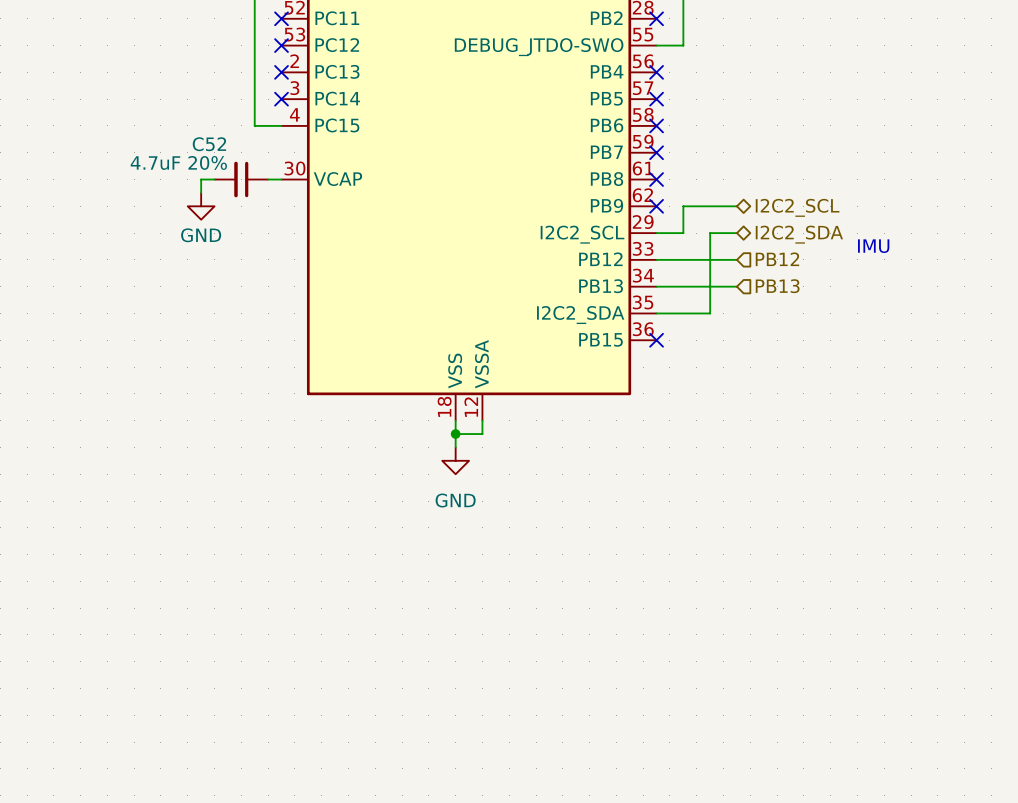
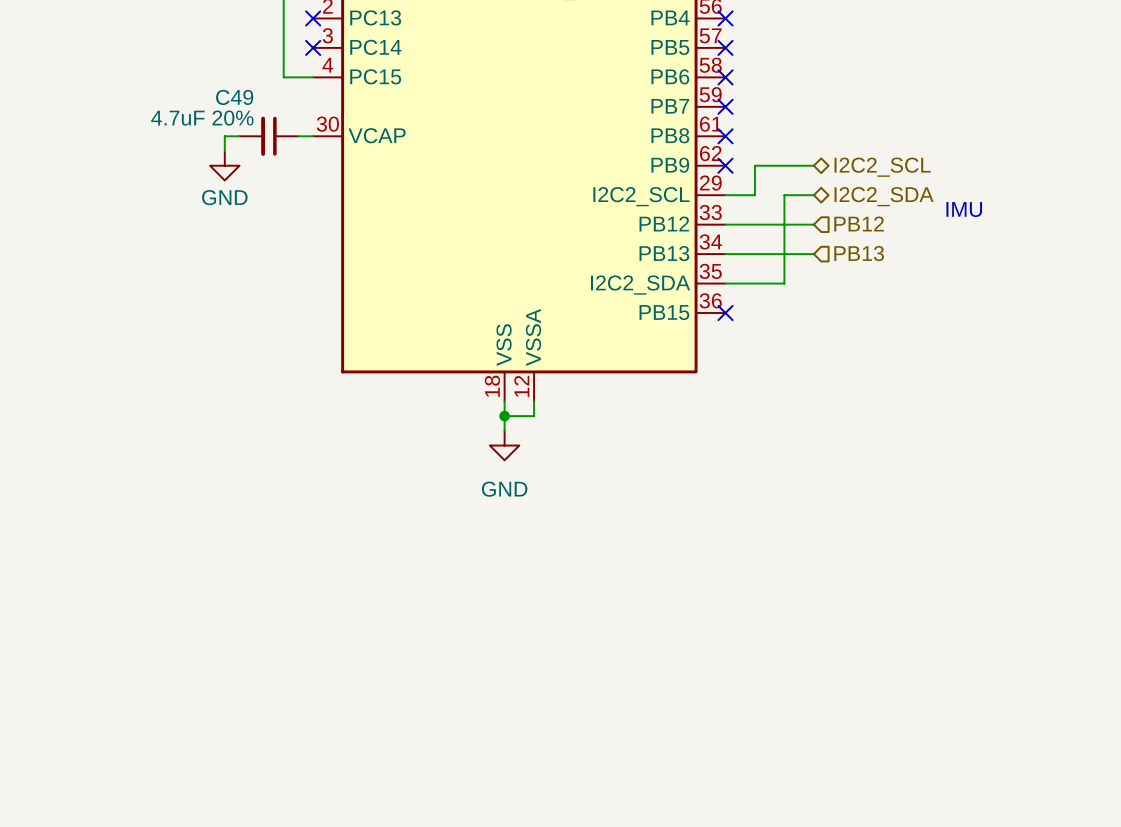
C52 name: C52 (209, 144) -> C49 (234, 97)

